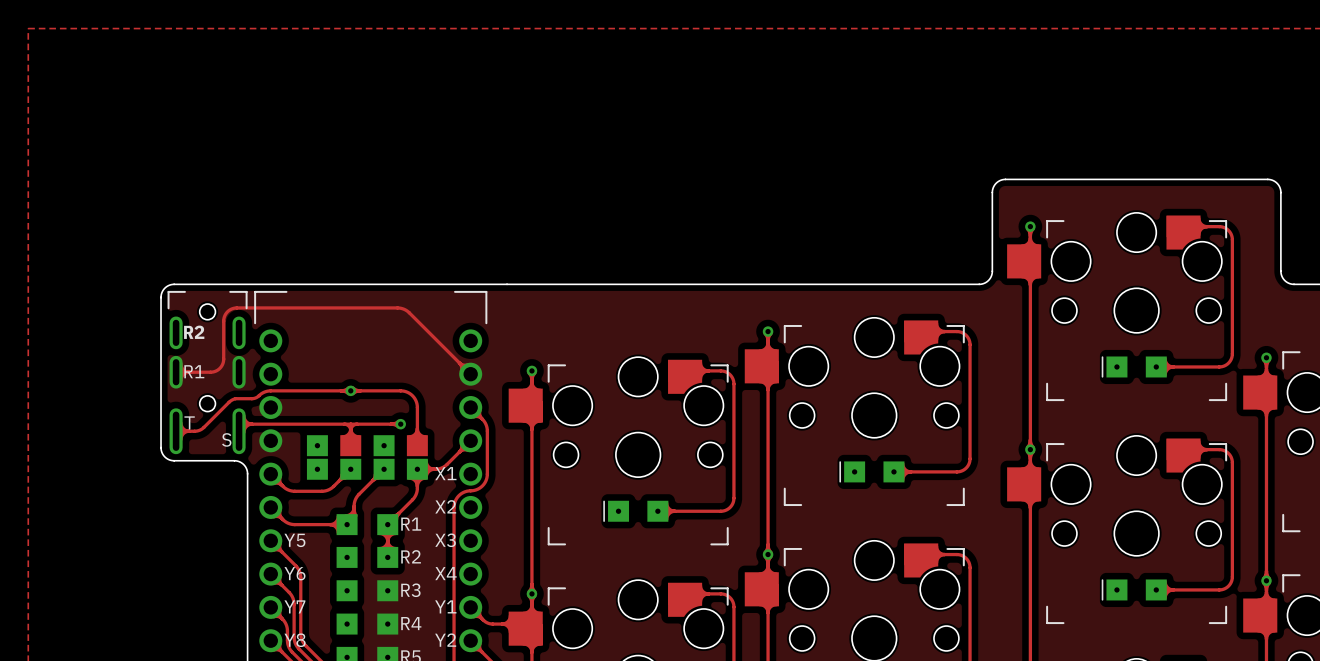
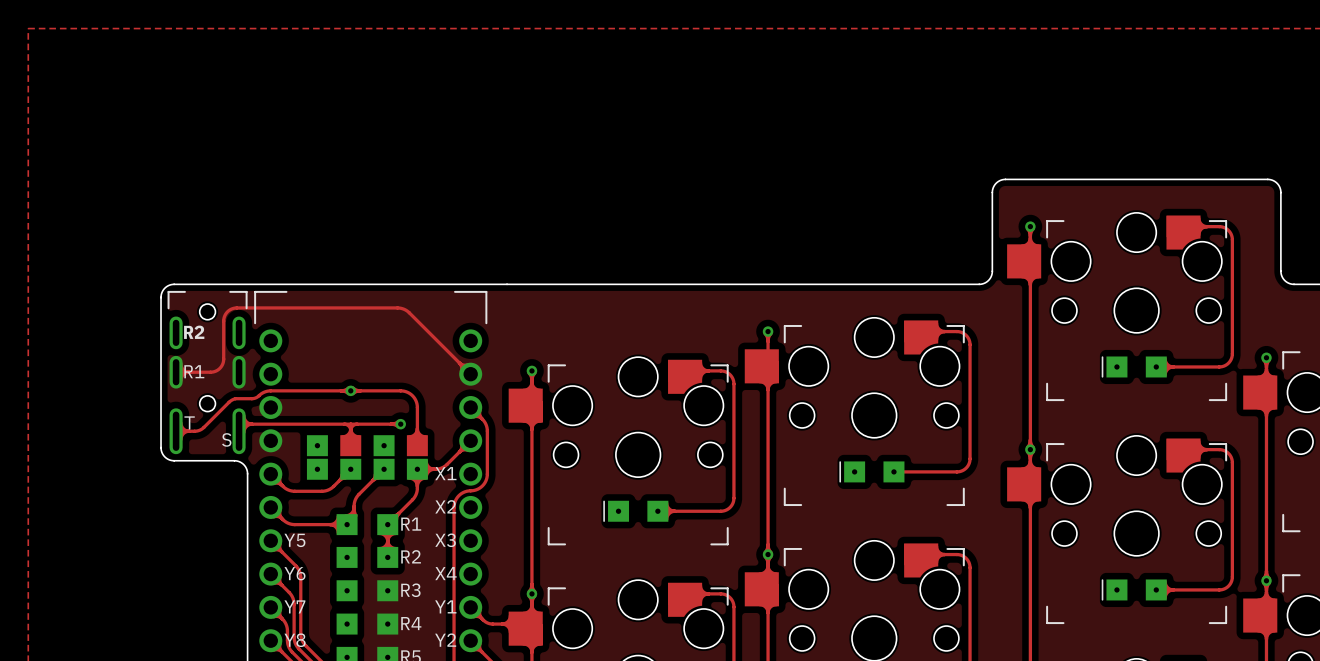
track: (759, 350) (765, 348) (768, 342) (770, 348) (776, 350) -> none
track: (902, 463) (905, 469) (911, 471) (905, 474) (902, 480) -> none

